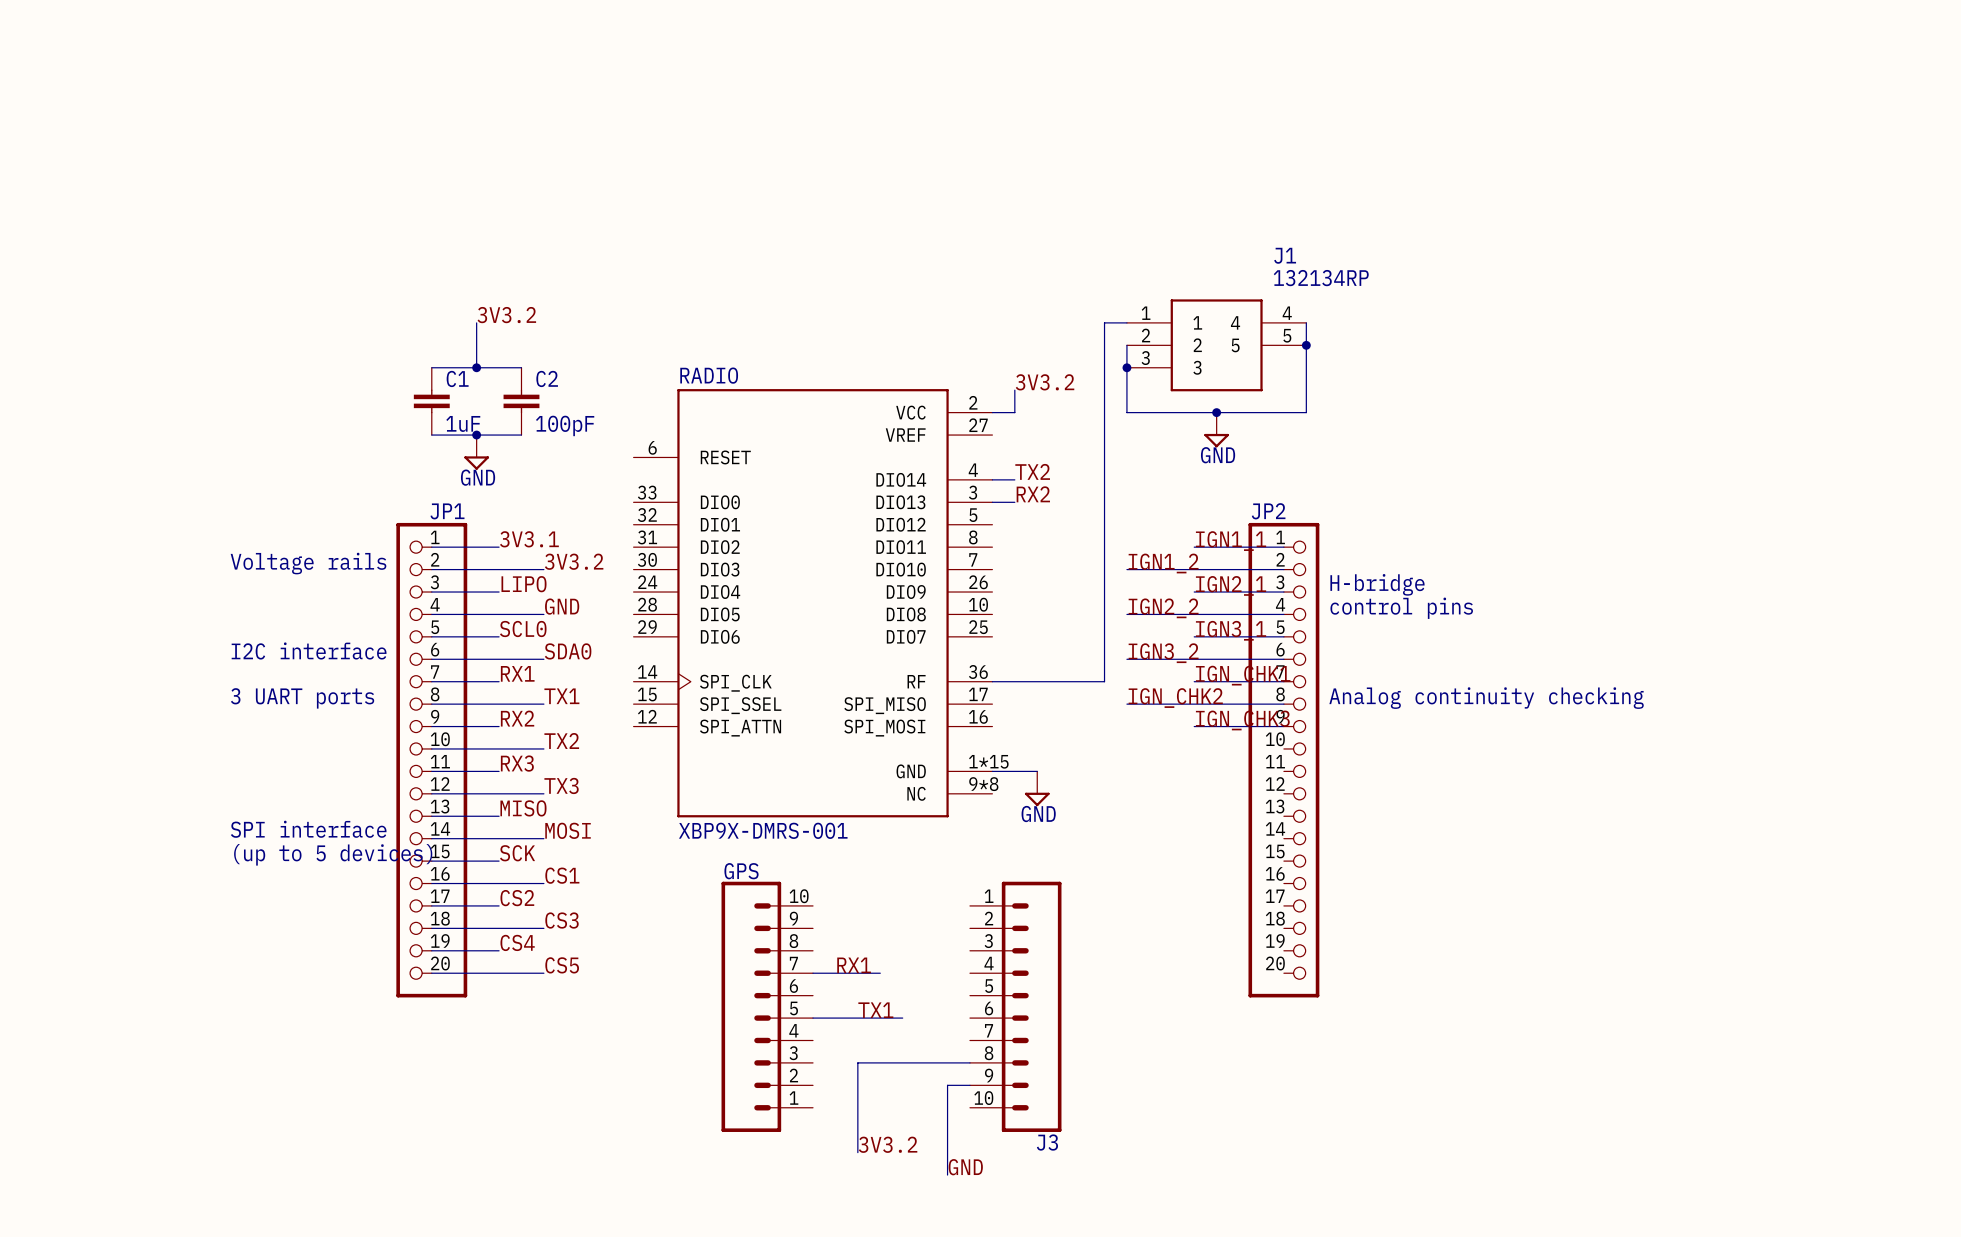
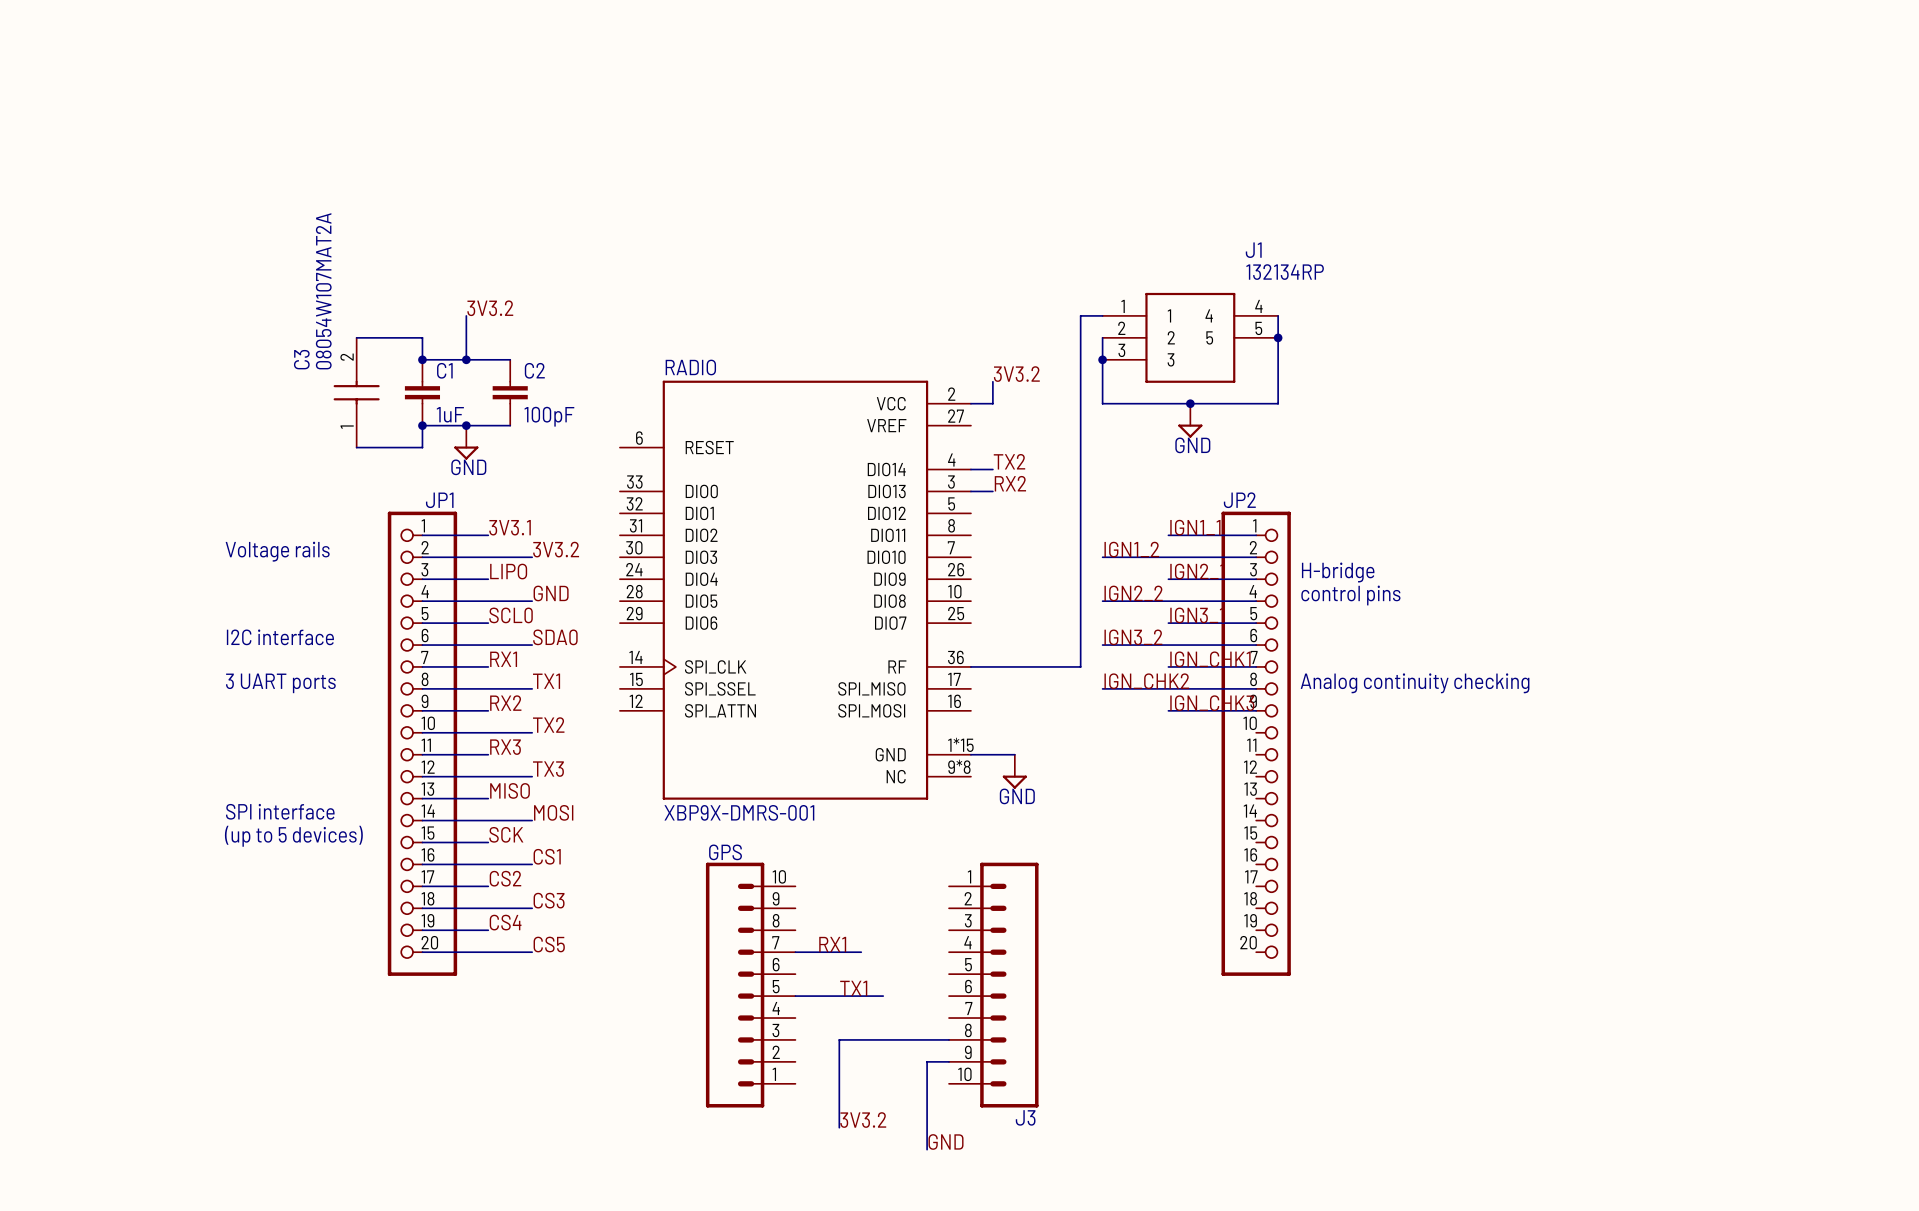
wire: none -> (356, 337) (422, 337) (422, 359)
junction: none -> (422, 359)
C3: none -> 08054W107MAT2A (356, 392)
wire: none -> (422, 425) (422, 447) (356, 447)
junction: none -> (422, 425)

